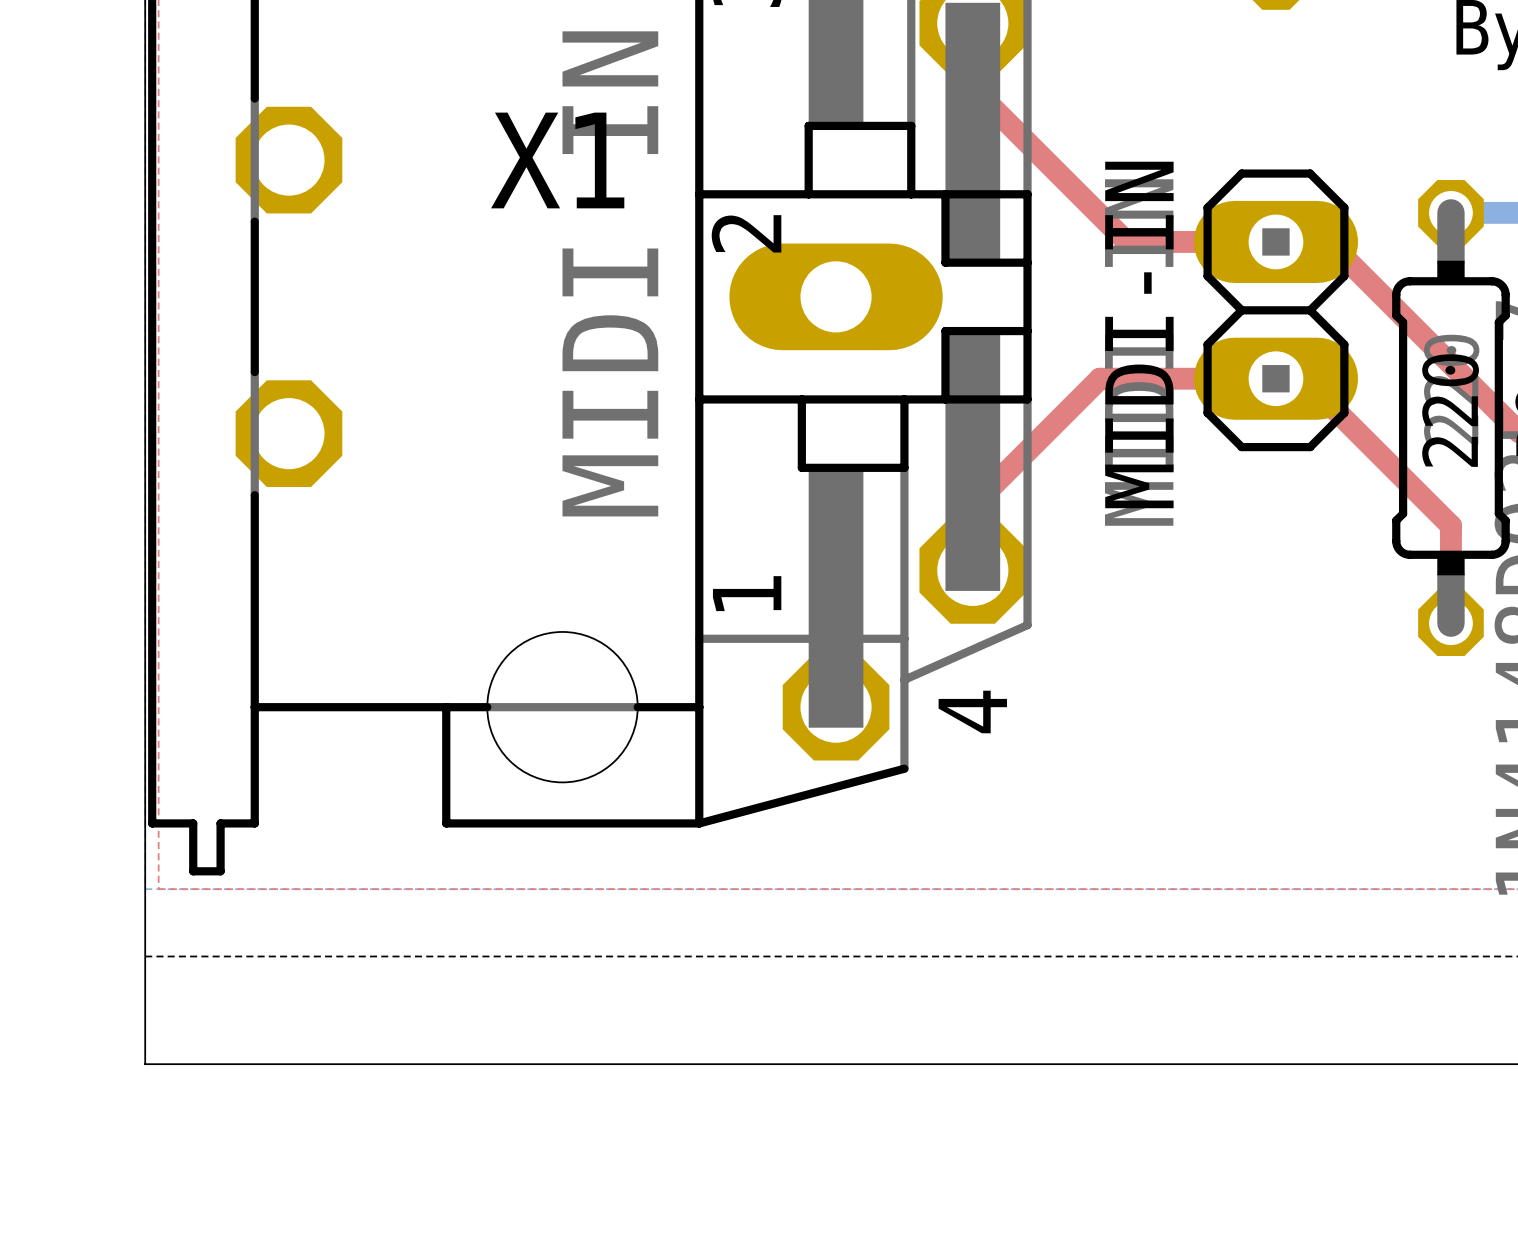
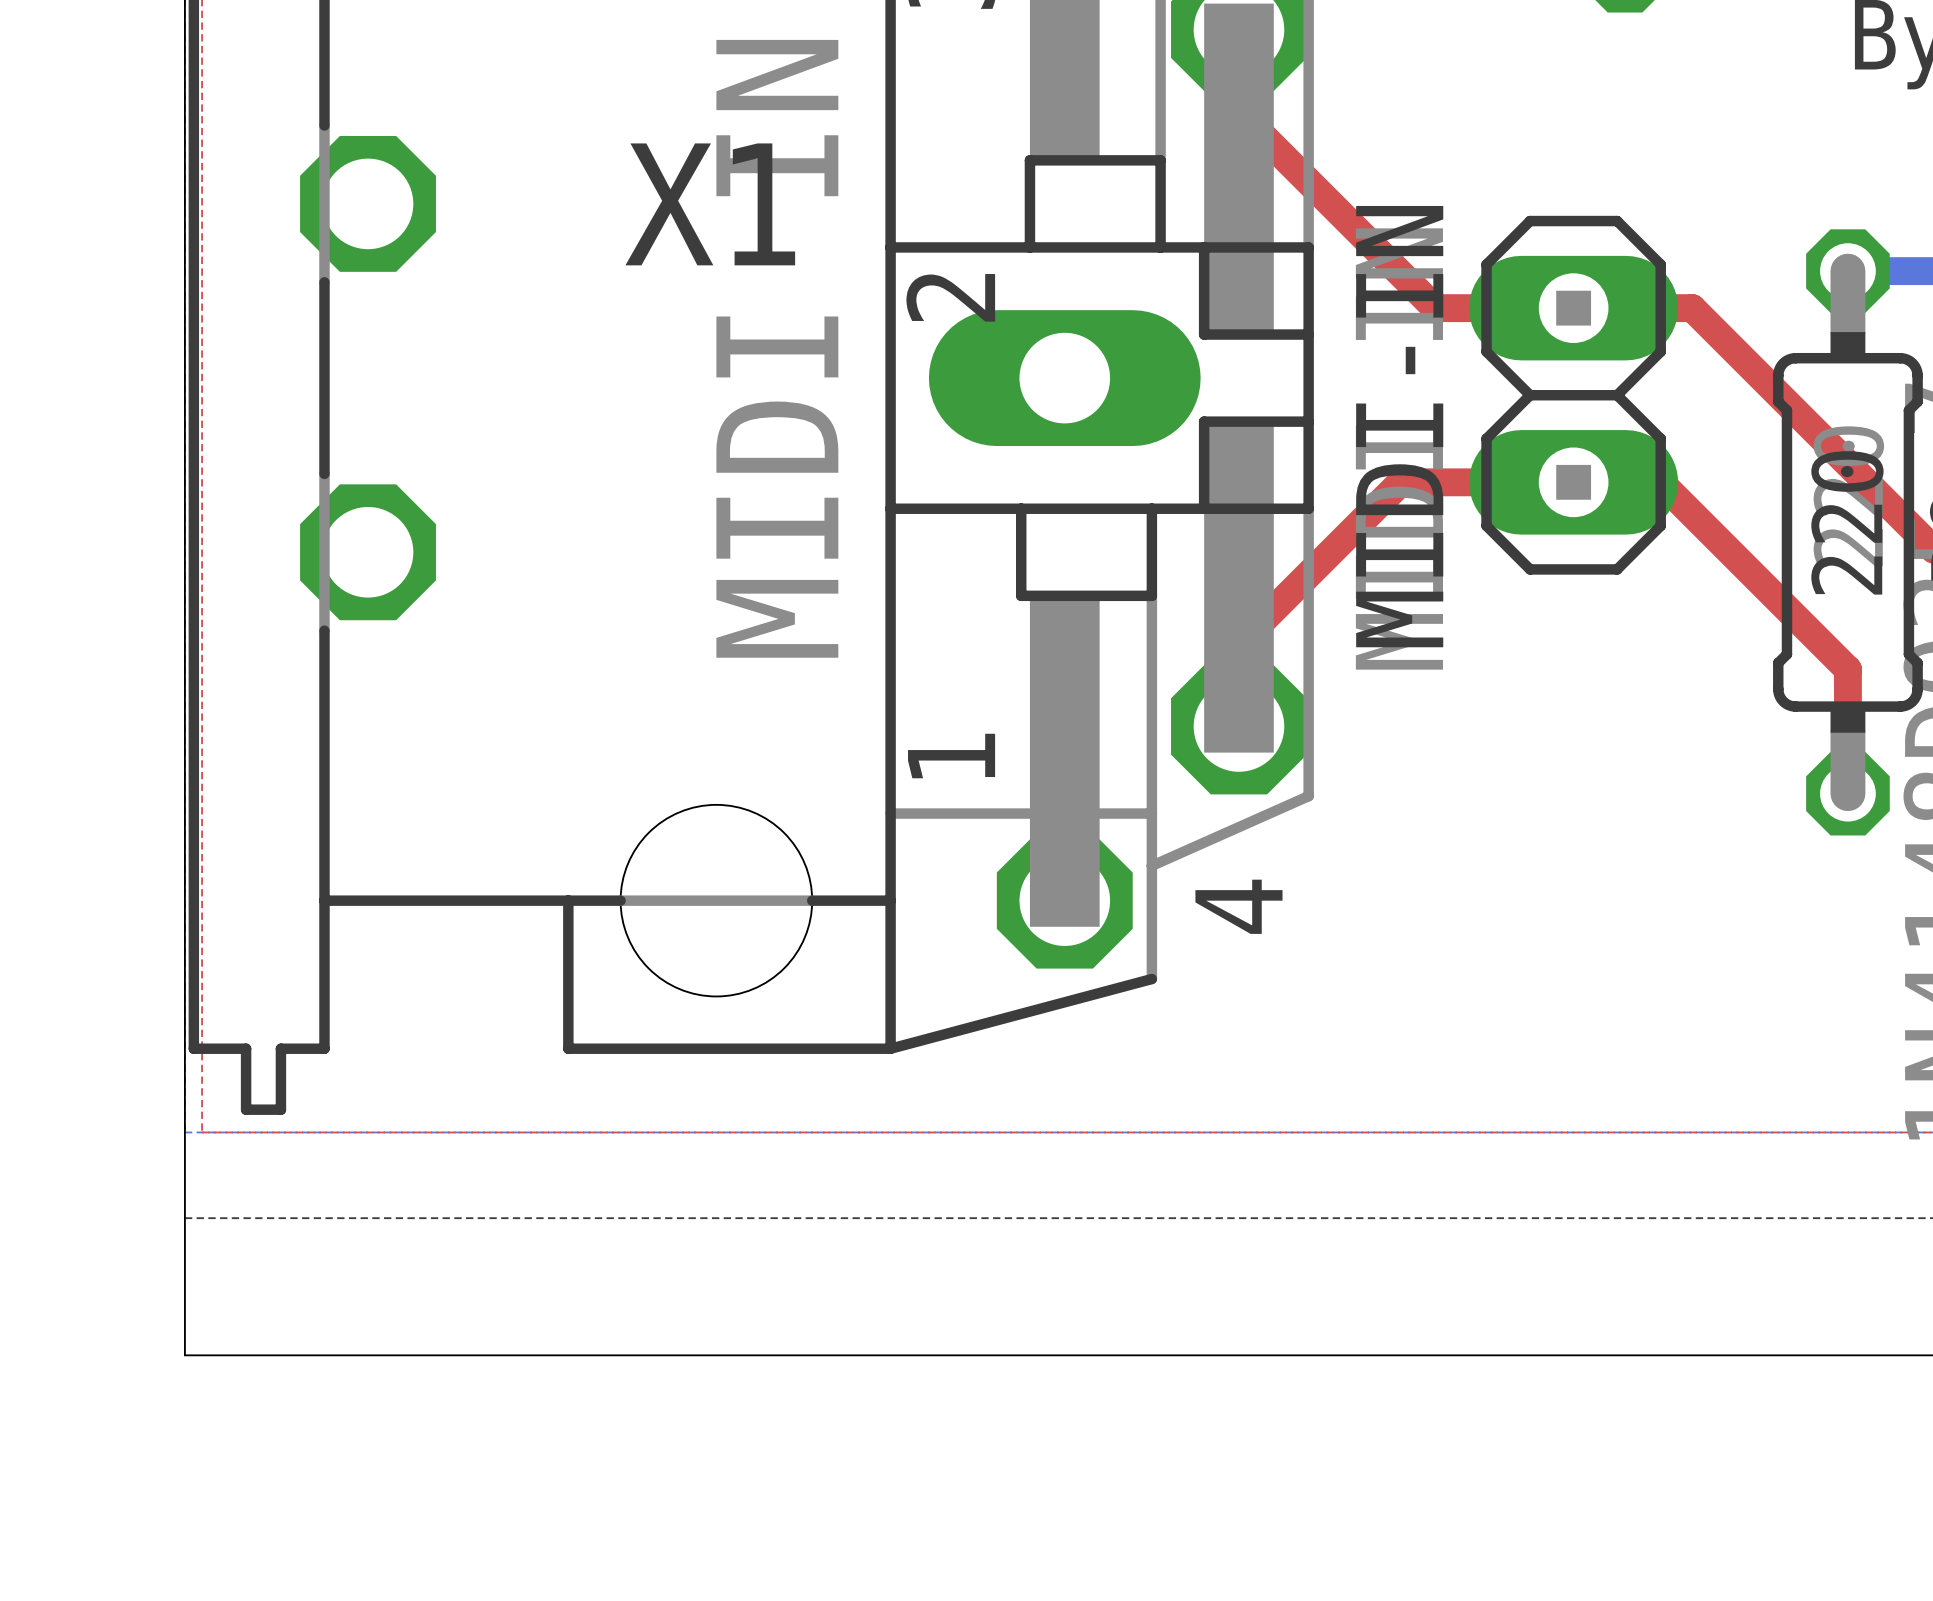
MIDI-IN position: (1275, 310) -> (1573, 395)

